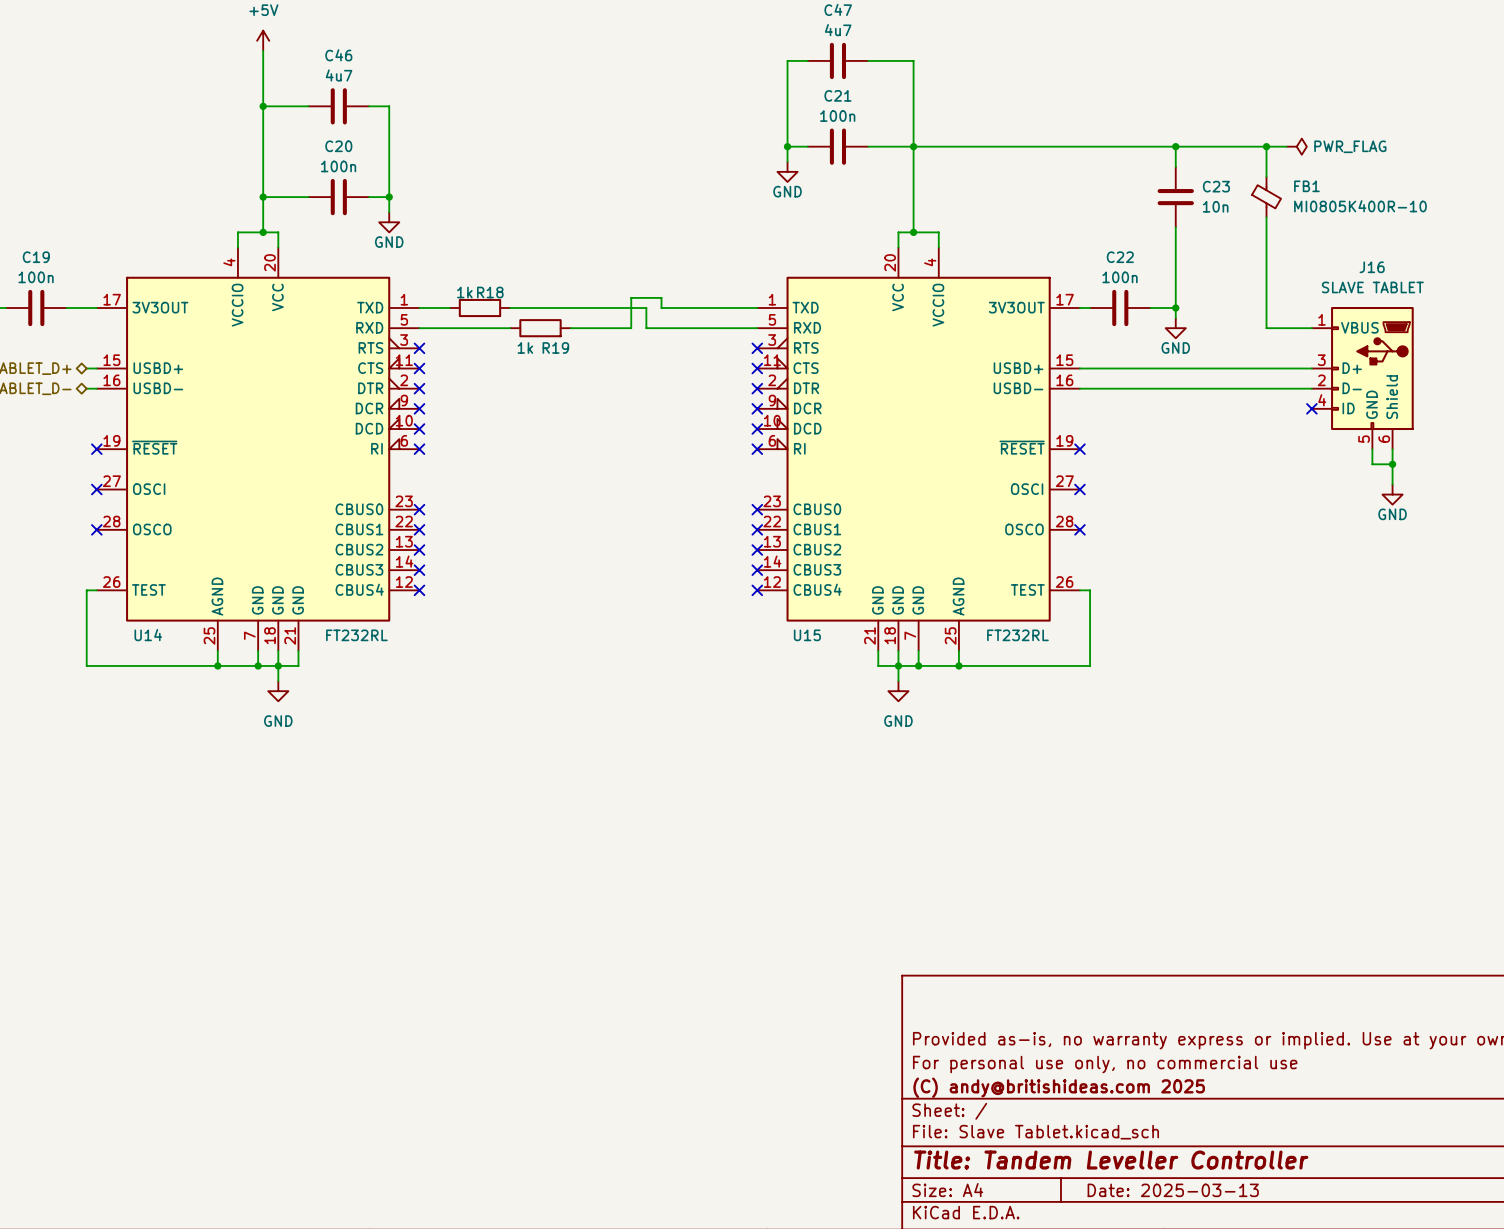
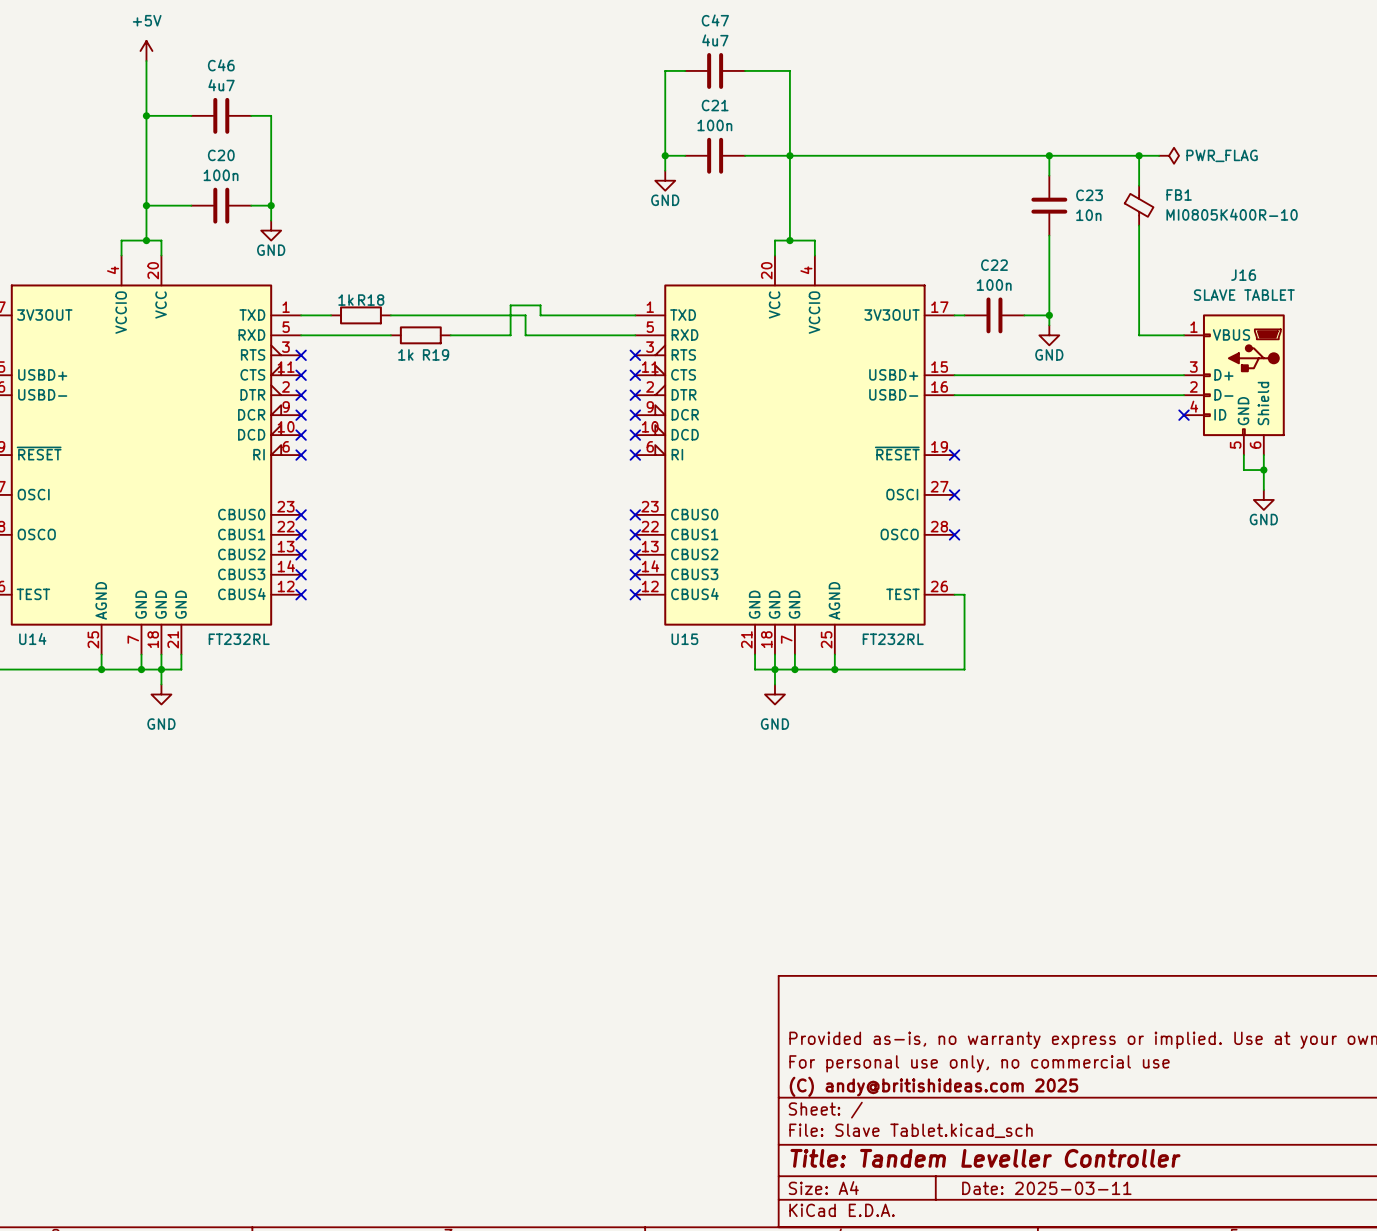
title block: Date: 2025-03-13 (1173, 1190) -> Date: 2025-03-11 (1046, 1188)

